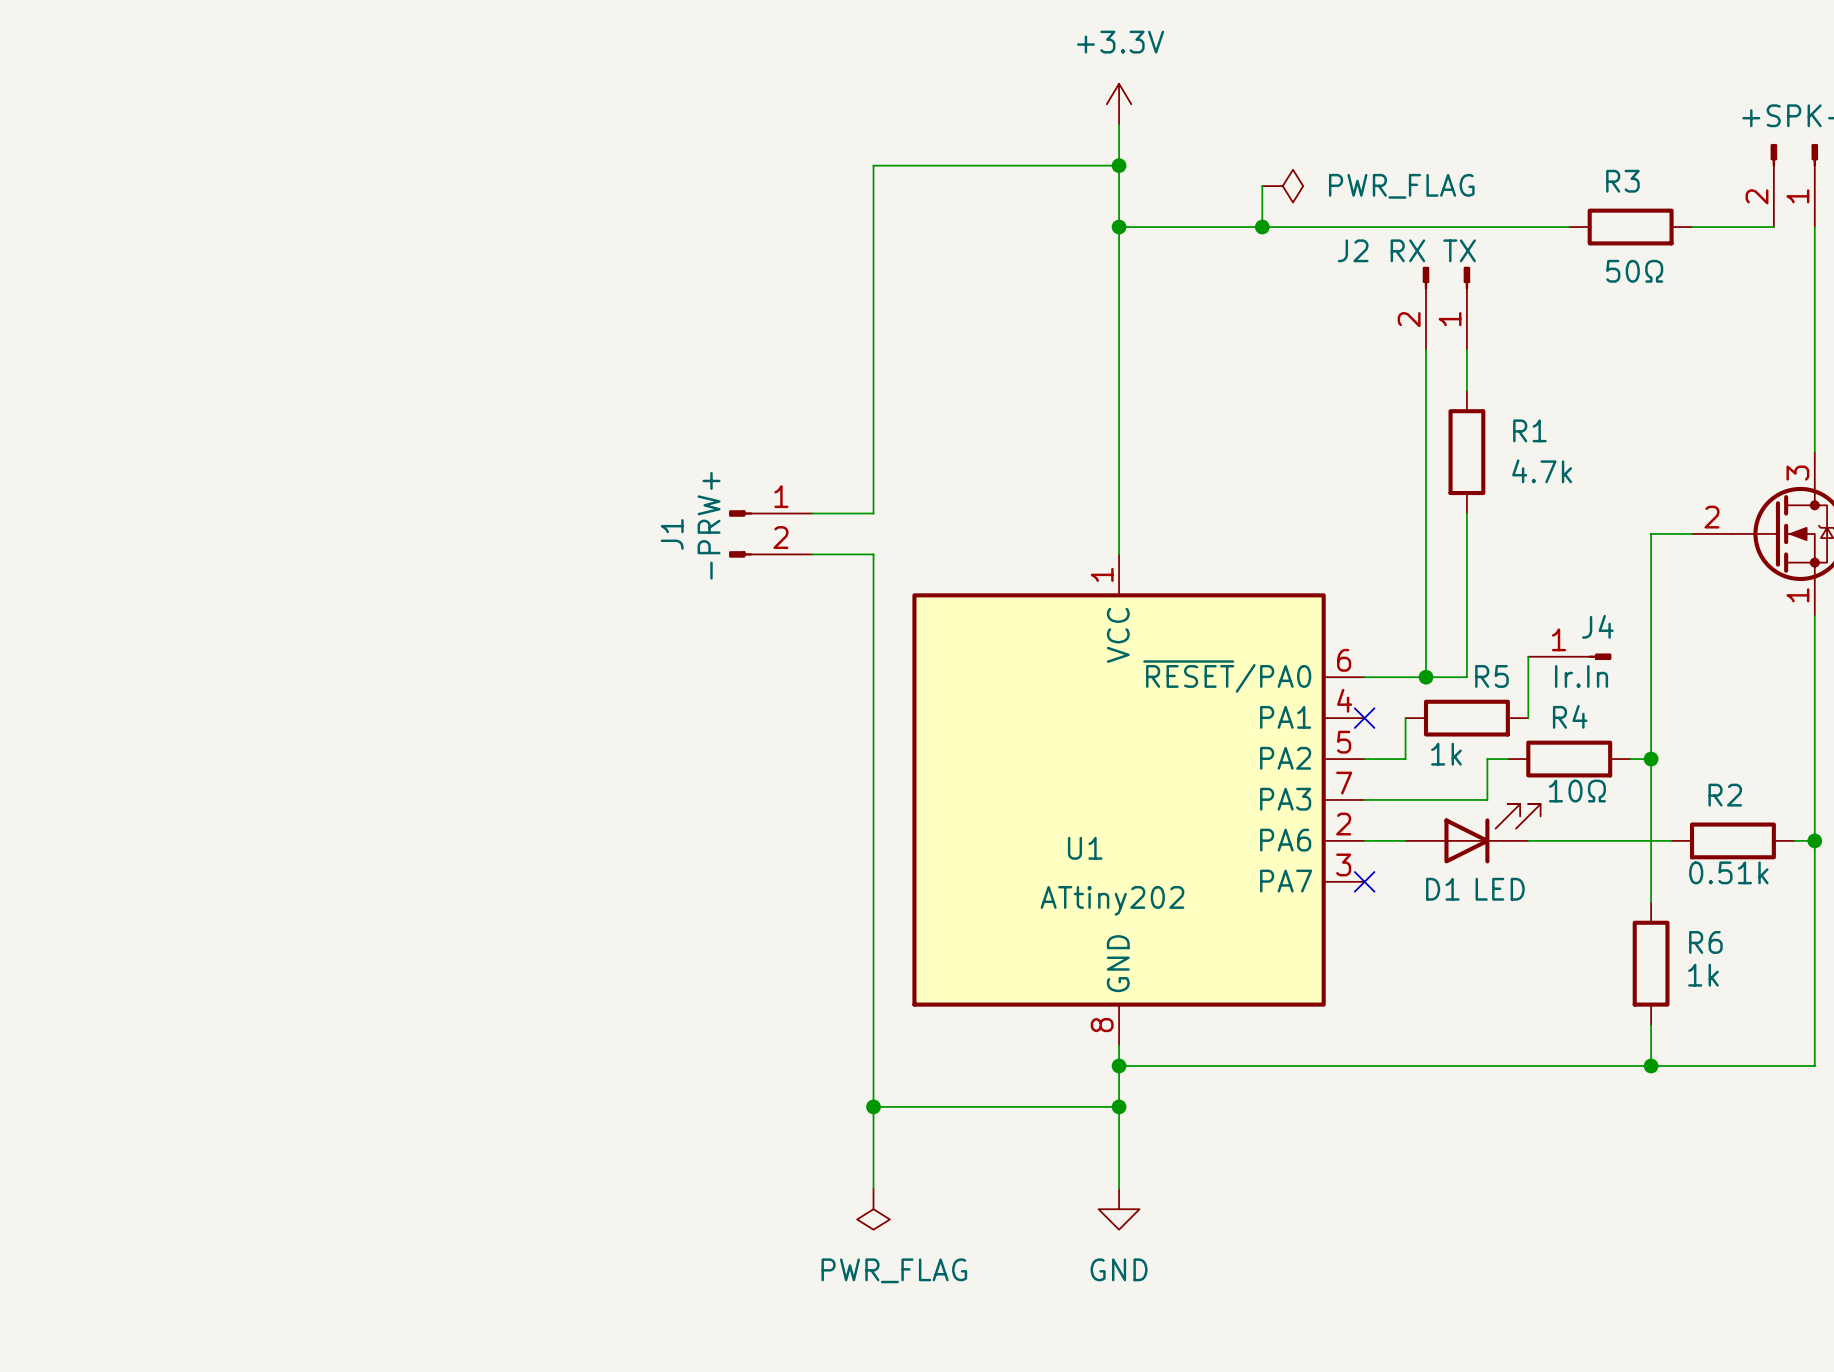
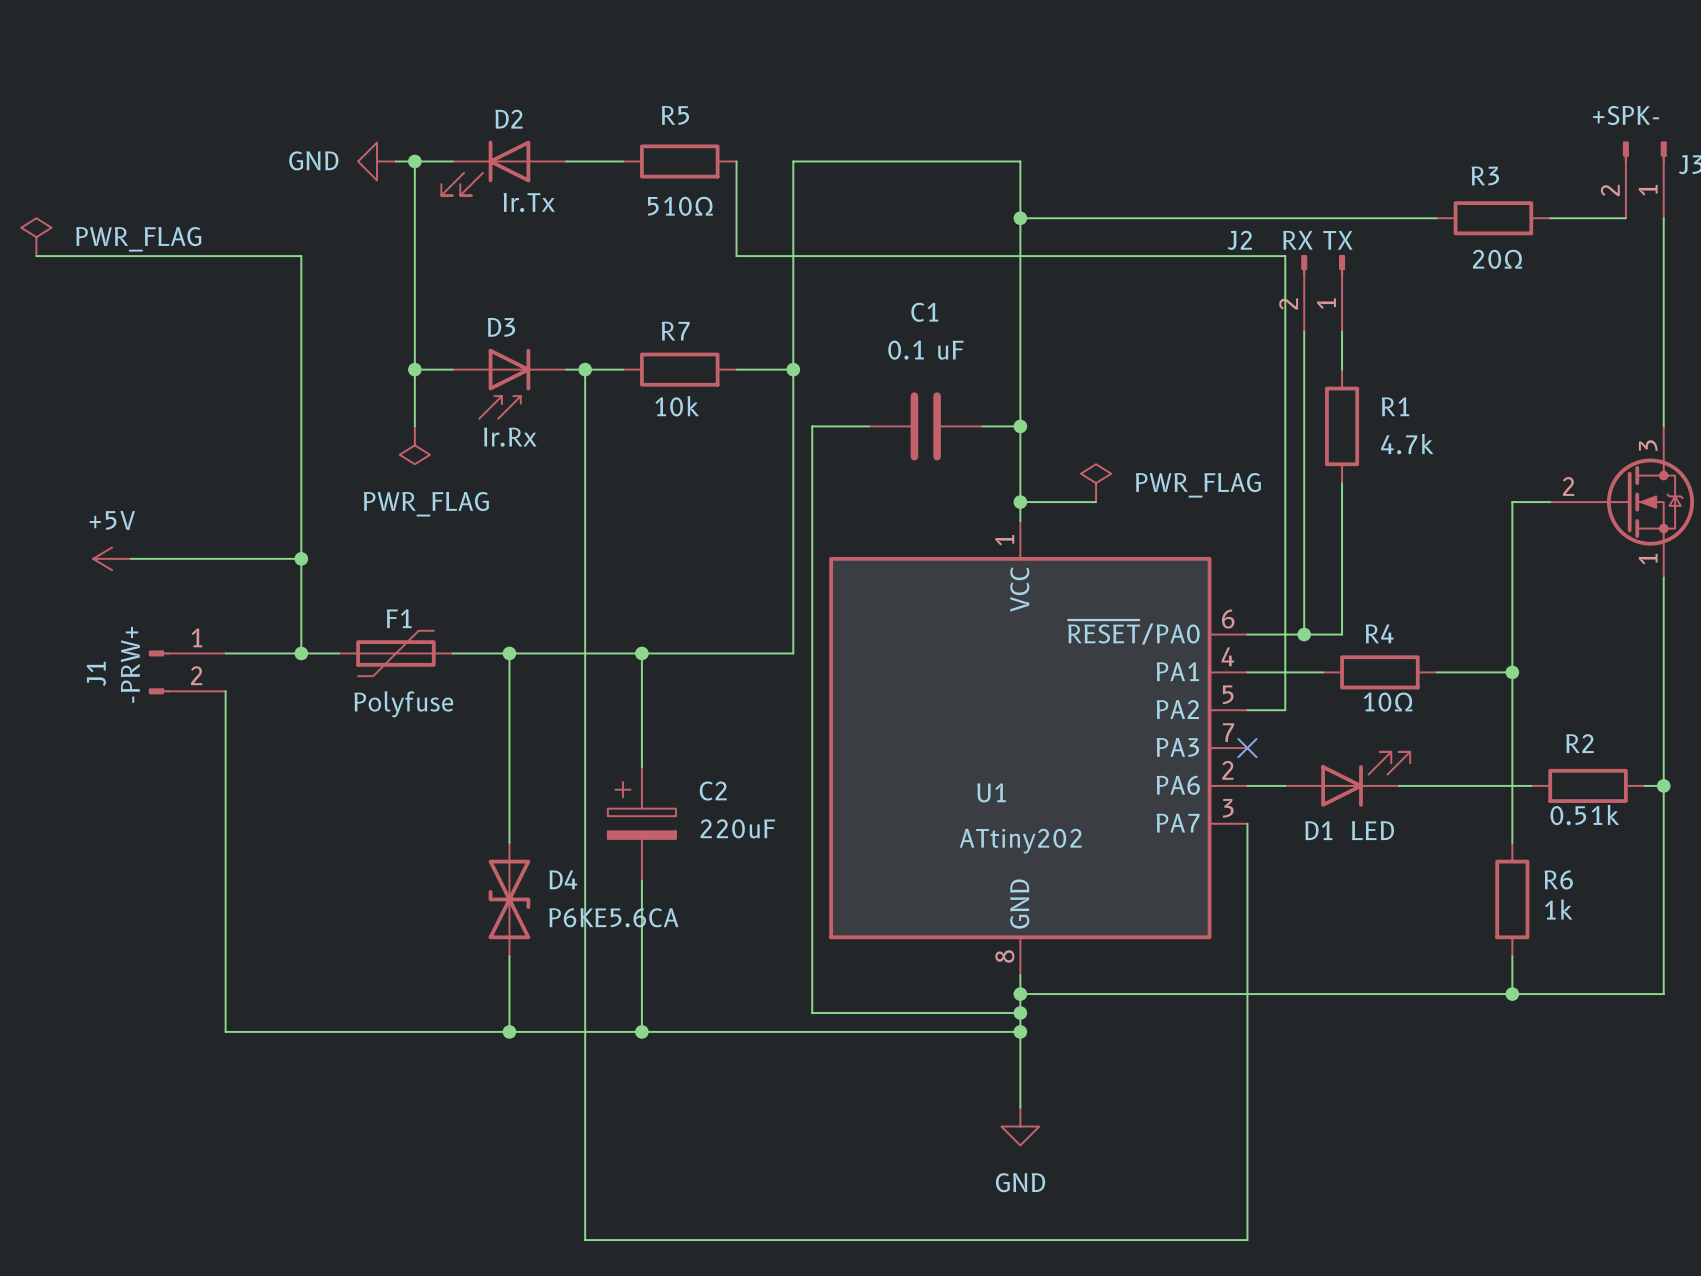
power symbol: +3.3V (1119, 104) -> none
wire: (1119, 124) (1119, 165) -> none
power symbol: none -> GND (377, 161)
wire: none -> (395, 161) (452, 161)
wire: none -> (414, 161) (414, 426)
junction: none -> (414, 161)
wire: none -> (566, 161) (623, 161)
wire: none -> (736, 161) (736, 256) (1285, 256) (1285, 672)
junction: (1119, 165) -> none
D2: none -> Ir.Tx (503, 168)
wire: (1262, 186) (1262, 227) -> none
power symbol rotation: 0° (1282, 186) -> 90° counterclockwise (1096, 483)
power symbol position: PWR_FLAG (1282, 186) -> PWR_FLAG (1096, 483)
junction: (1262, 227) -> none
power symbol: none -> PWR_FLAG (36, 237)
wire: none -> (36, 256) (301, 256) (301, 653)
R3 value: 50Ω (1634, 271) -> 20Ω (1497, 259)
wire: none -> (414, 369) (452, 369)
junction: none -> (414, 369)
wire: none -> (566, 369) (623, 369)
wire: none -> (585, 369) (585, 1240) (1247, 1240) (1247, 823)
junction: none -> (585, 369)
R7: none -> 10k (679, 369)
junction: none -> (793, 369)
D3: none -> Ir.Rx (509, 383)
wire: none -> (868, 426) (812, 426) (812, 1012) (1020, 1012)
C1: none -> 0.1 uF (925, 426)
wire: none -> (982, 426) (1020, 426)
junction: none -> (1020, 426)
power symbol: none -> PWR_FLAG (414, 445)
wire: (812, 513) (873, 513) -> (793, 521) (793, 483)
J1 position: (770, 533) -> (187, 672)
wire: none -> (1020, 502) (1096, 502)
junction: none -> (1020, 502)
wire: (812, 554) (873, 554) -> (736, 369) (793, 369)
power symbol: none -> +5V (112, 558)
wire: none -> (131, 558) (301, 558)
junction: none -> (301, 558)
wire: (1528, 656) (1528, 718) -> none
J4: Ir.In (1569, 656) -> none
R5 name position: R5 (1491, 676) -> R5 (675, 115)
wire: none -> (225, 653) (339, 653)
junction: none -> (301, 653)
F1: none -> Polyfuse (395, 653)
wire: none -> (509, 653) (509, 842)
junction: none -> (509, 653)
wire: none -> (641, 653) (641, 767)
junction: none -> (641, 653)
wire: (873, 697) (873, 1188) -> (793, 653) (452, 653)
wire: none -> (1247, 672) (1323, 672)
no-connect mark: (1364, 718) -> none
R5 position: (1466, 718) -> (679, 161)
wire: none -> (1436, 672) (1512, 672)
wire: none -> (225, 691) (225, 1031) (793, 1031)
R5 value: 1k (1446, 754) -> 510Ω (680, 206)
wire: (1507, 759) (1487, 759) (1487, 799) (1364, 799) -> none
R4 position: (1569, 759) -> (1379, 672)
wire: (1630, 759) (1651, 759) -> none
junction position: (1651, 759) -> (1512, 672)
no-connect mark: none -> (1247, 748)
C2: none -> 220uF (641, 823)
no-connect mark: (1364, 881) -> none
wire: none -> (641, 880) (641, 1031)
D4: none -> P6KE5.6CA (509, 899)
wire: none -> (509, 956) (509, 1031)
junction: none -> (1020, 1012)
junction: none -> (509, 1031)
junction: none -> (641, 1031)
junction: (873, 1106) -> none
power symbol: PWR_FLAG (873, 1209) -> none

